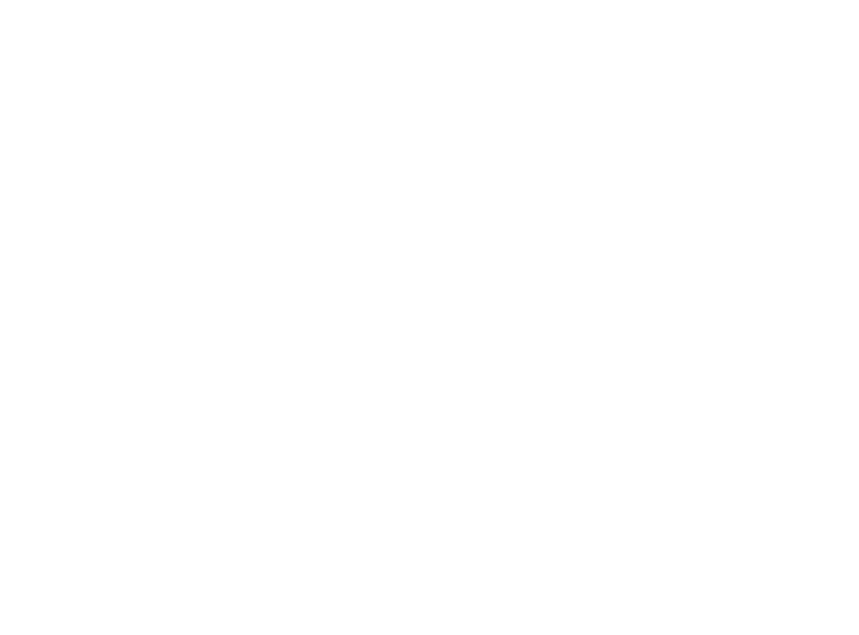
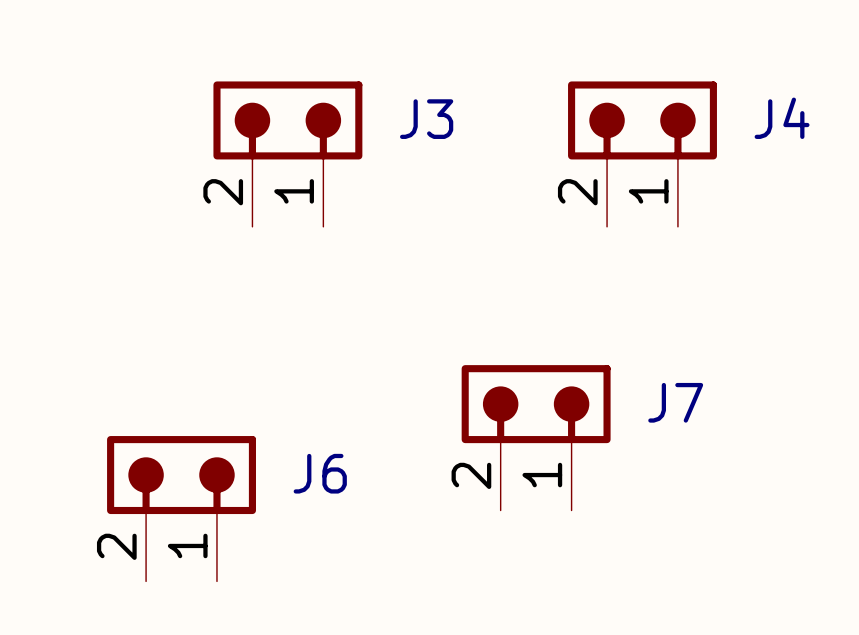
J3: none -> (287, 154)
J4: none -> (642, 154)
J7: none -> (536, 437)
J6: none -> (181, 508)

